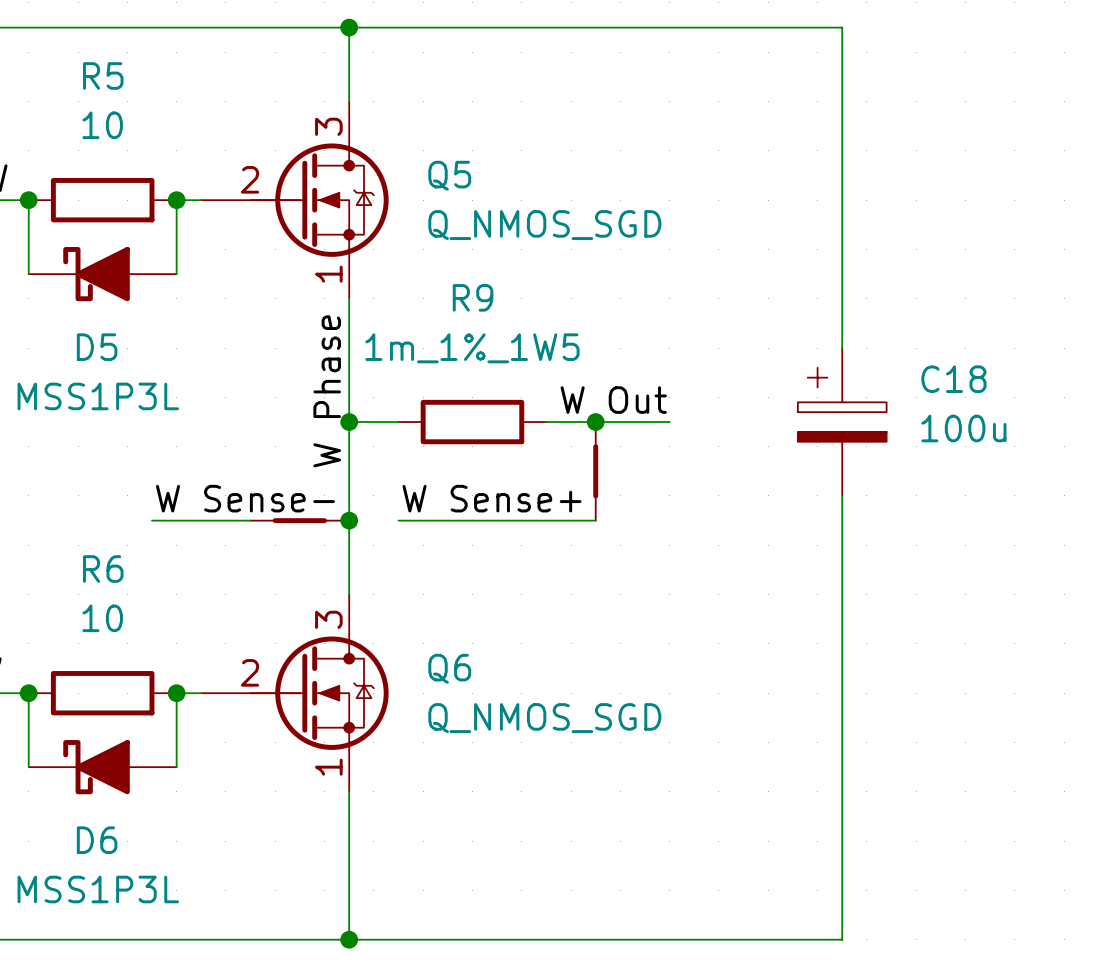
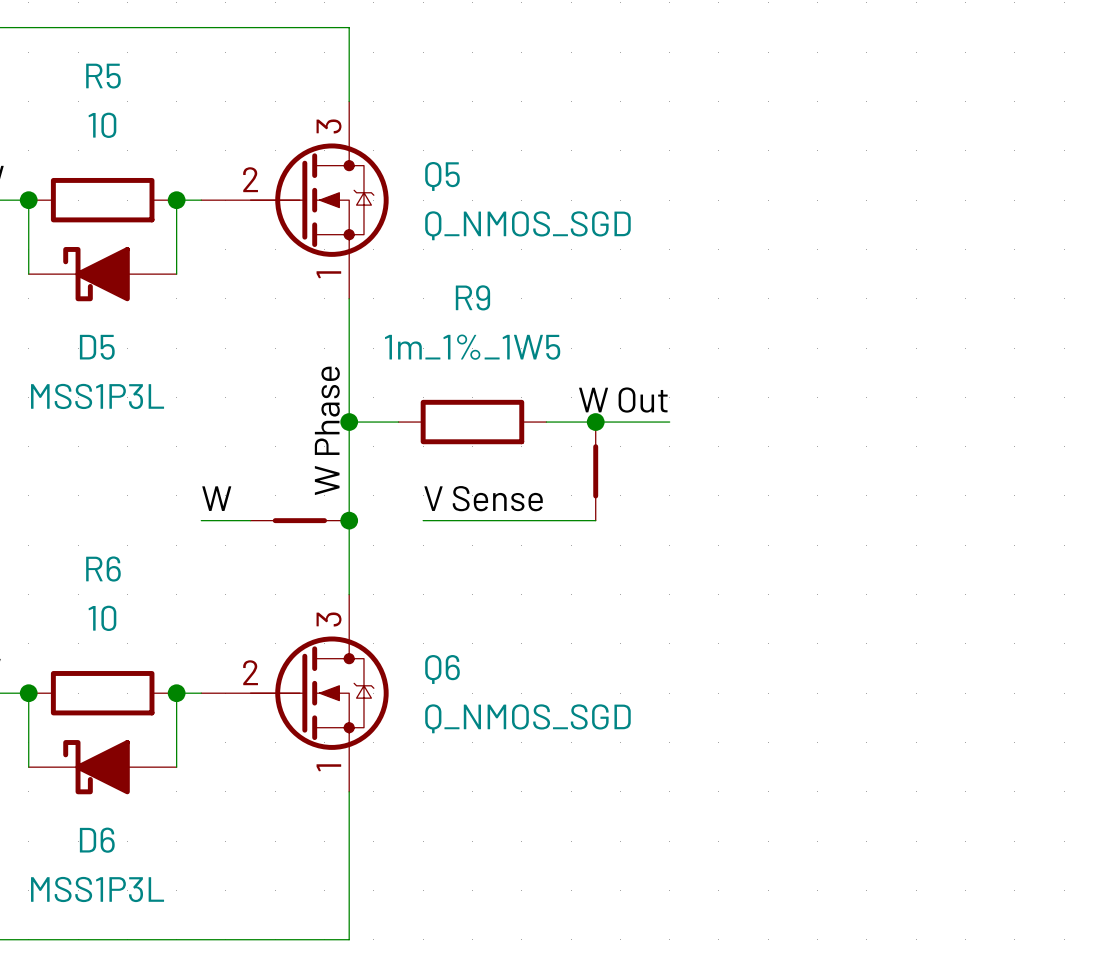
wire: (349, 27) (842, 27) (842, 348) -> none
junction: (349, 27) -> none
label position: W Phase (327, 391) -> W Phase (327, 430)
C18: 100u (842, 422) -> none
wire: (842, 495) (842, 939) (349, 939) -> none
label: none -> W (216, 498)
label: W Sense- (245, 498) -> none
label: W Sense+ (492, 498) -> V Sense (483, 498)
wire: (151, 520) (201, 520) -> none
wire: (398, 520) (423, 520) -> none
junction: (349, 939) -> none

